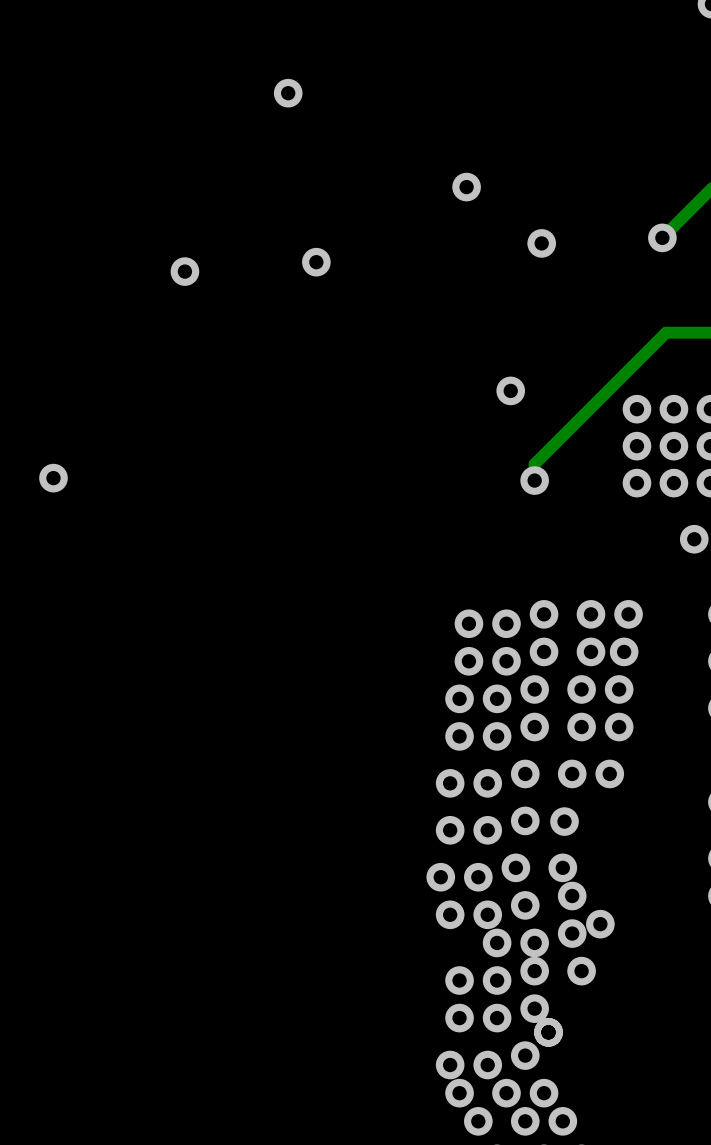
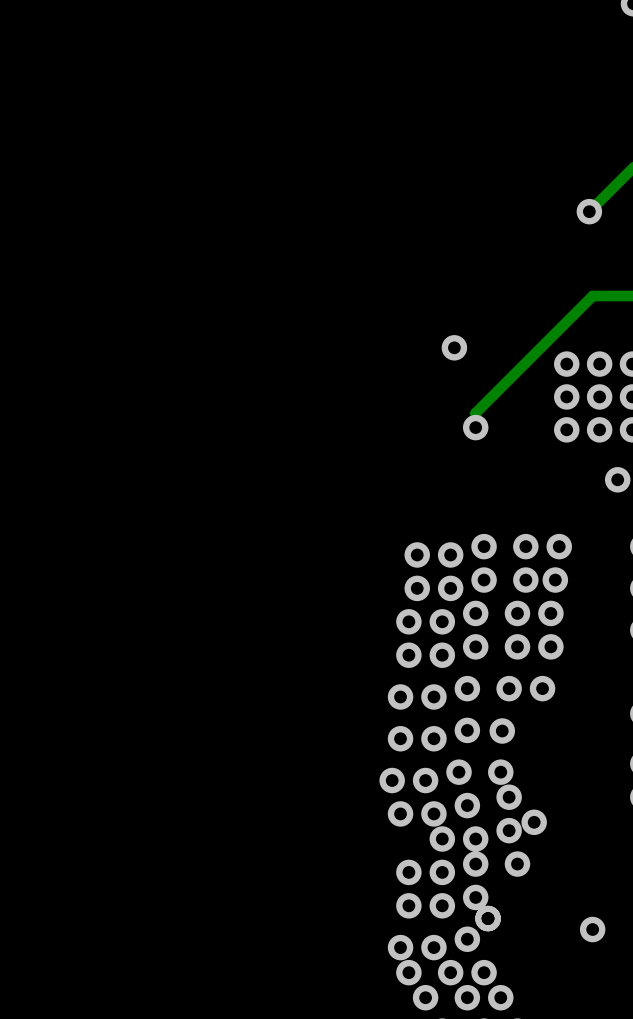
via: (288, 93) -> none
via: (466, 187) -> none
via: (541, 243) -> none
via: (316, 262) -> none
via: (184, 271) -> none
via: (53, 478) -> none
via: none -> (592, 929)

